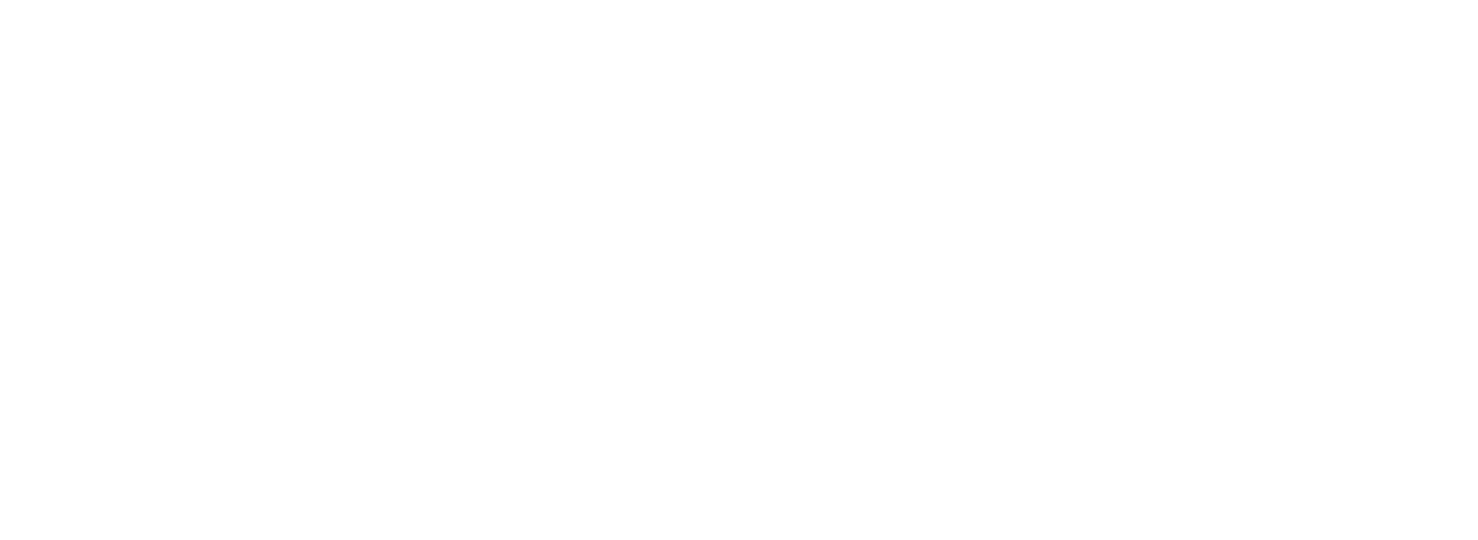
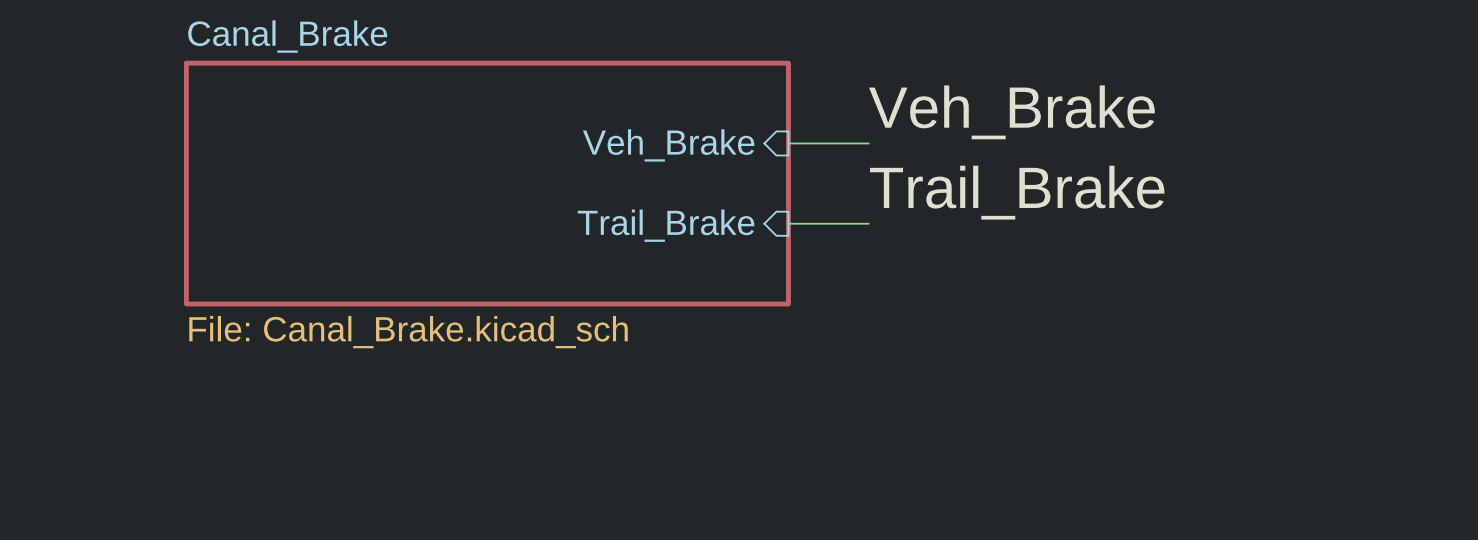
label: none -> Veh_Brake (1011, 112)
sheet pin: none -> Veh_Brake (668, 145)
wire: none -> (788, 143) (868, 143)
sheet Canal_Brake: none -> File: Canal_Brake.kicad_sch (487, 183)
label: none -> Trail_Brake (1017, 192)
sheet pin: none -> Trail_Brake (666, 225)
wire: none -> (788, 223) (868, 223)

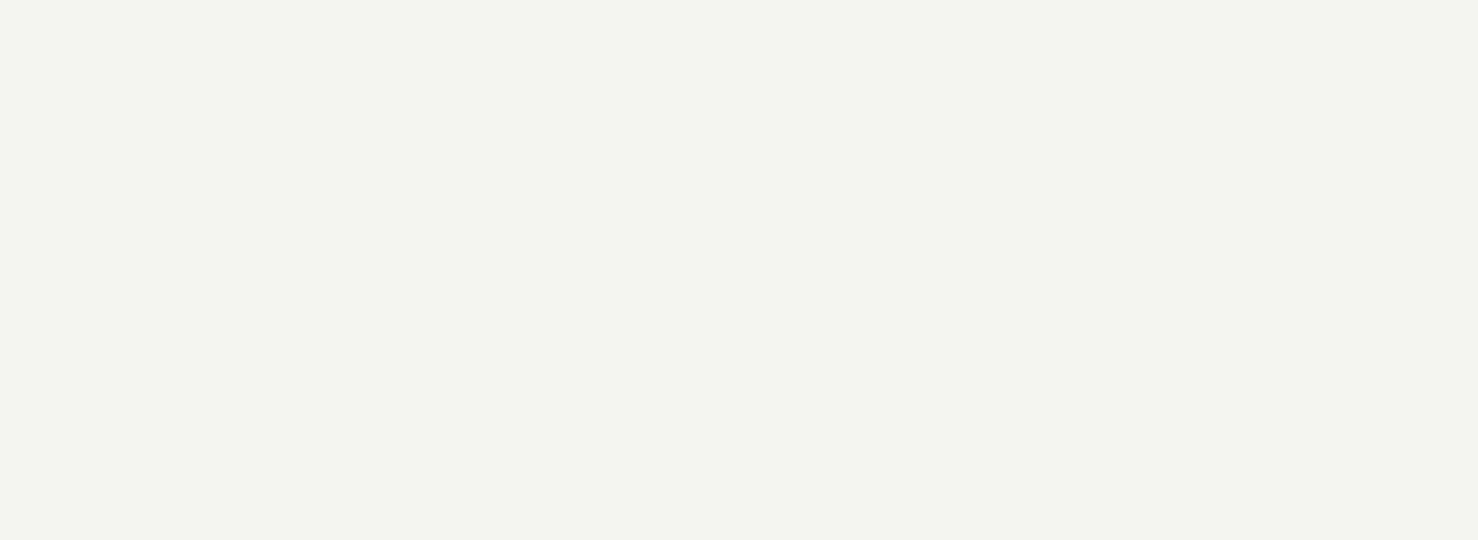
label: Veh_Brake (1011, 112) -> none
wire: (788, 143) (868, 143) -> none
sheet pin: Veh_Brake (668, 145) -> none
sheet Canal_Brake: File: Canal_Brake.kicad_sch (487, 183) -> none
label: Trail_Brake (1017, 192) -> none
wire: (788, 223) (868, 223) -> none
sheet pin: Trail_Brake (666, 225) -> none

